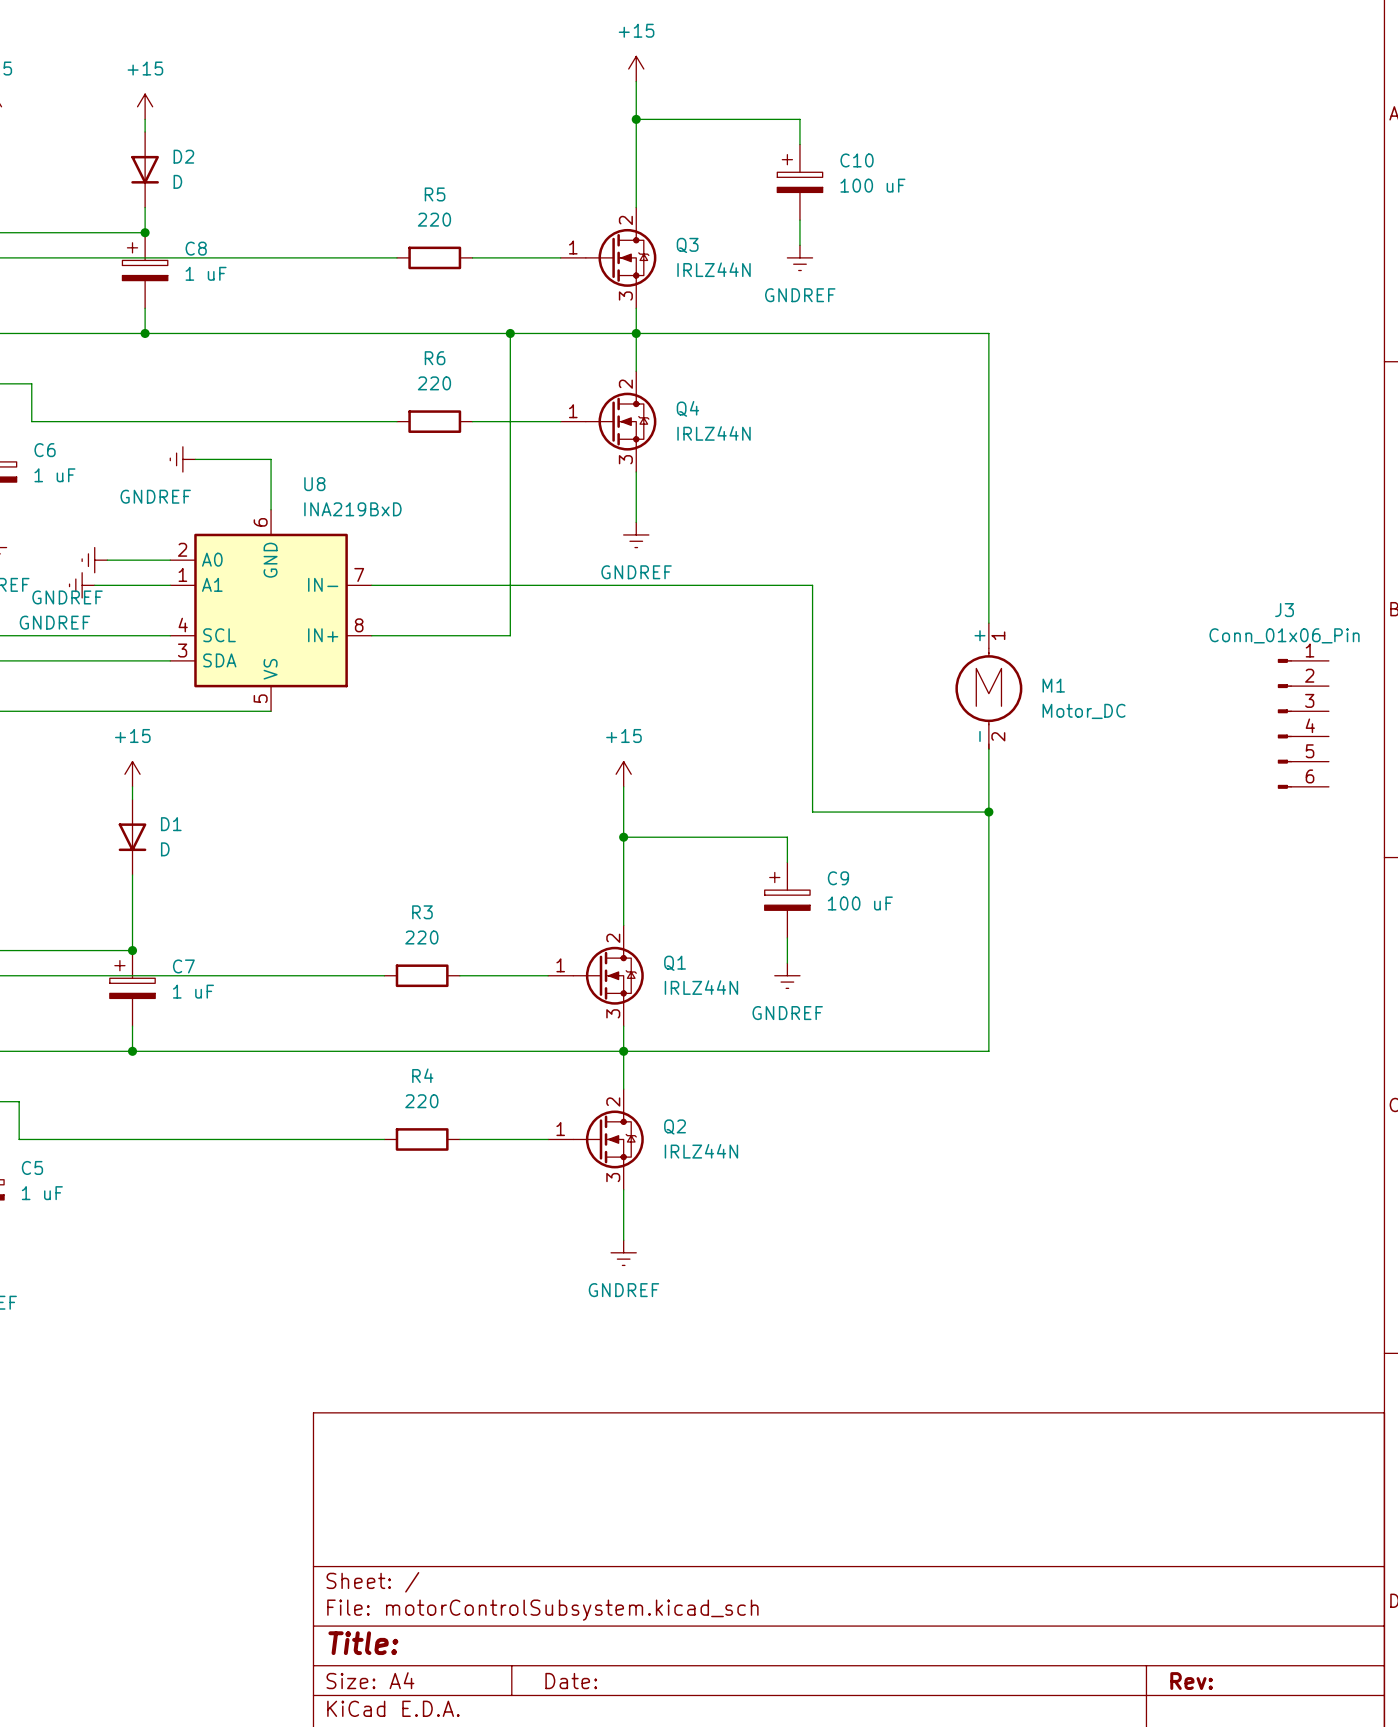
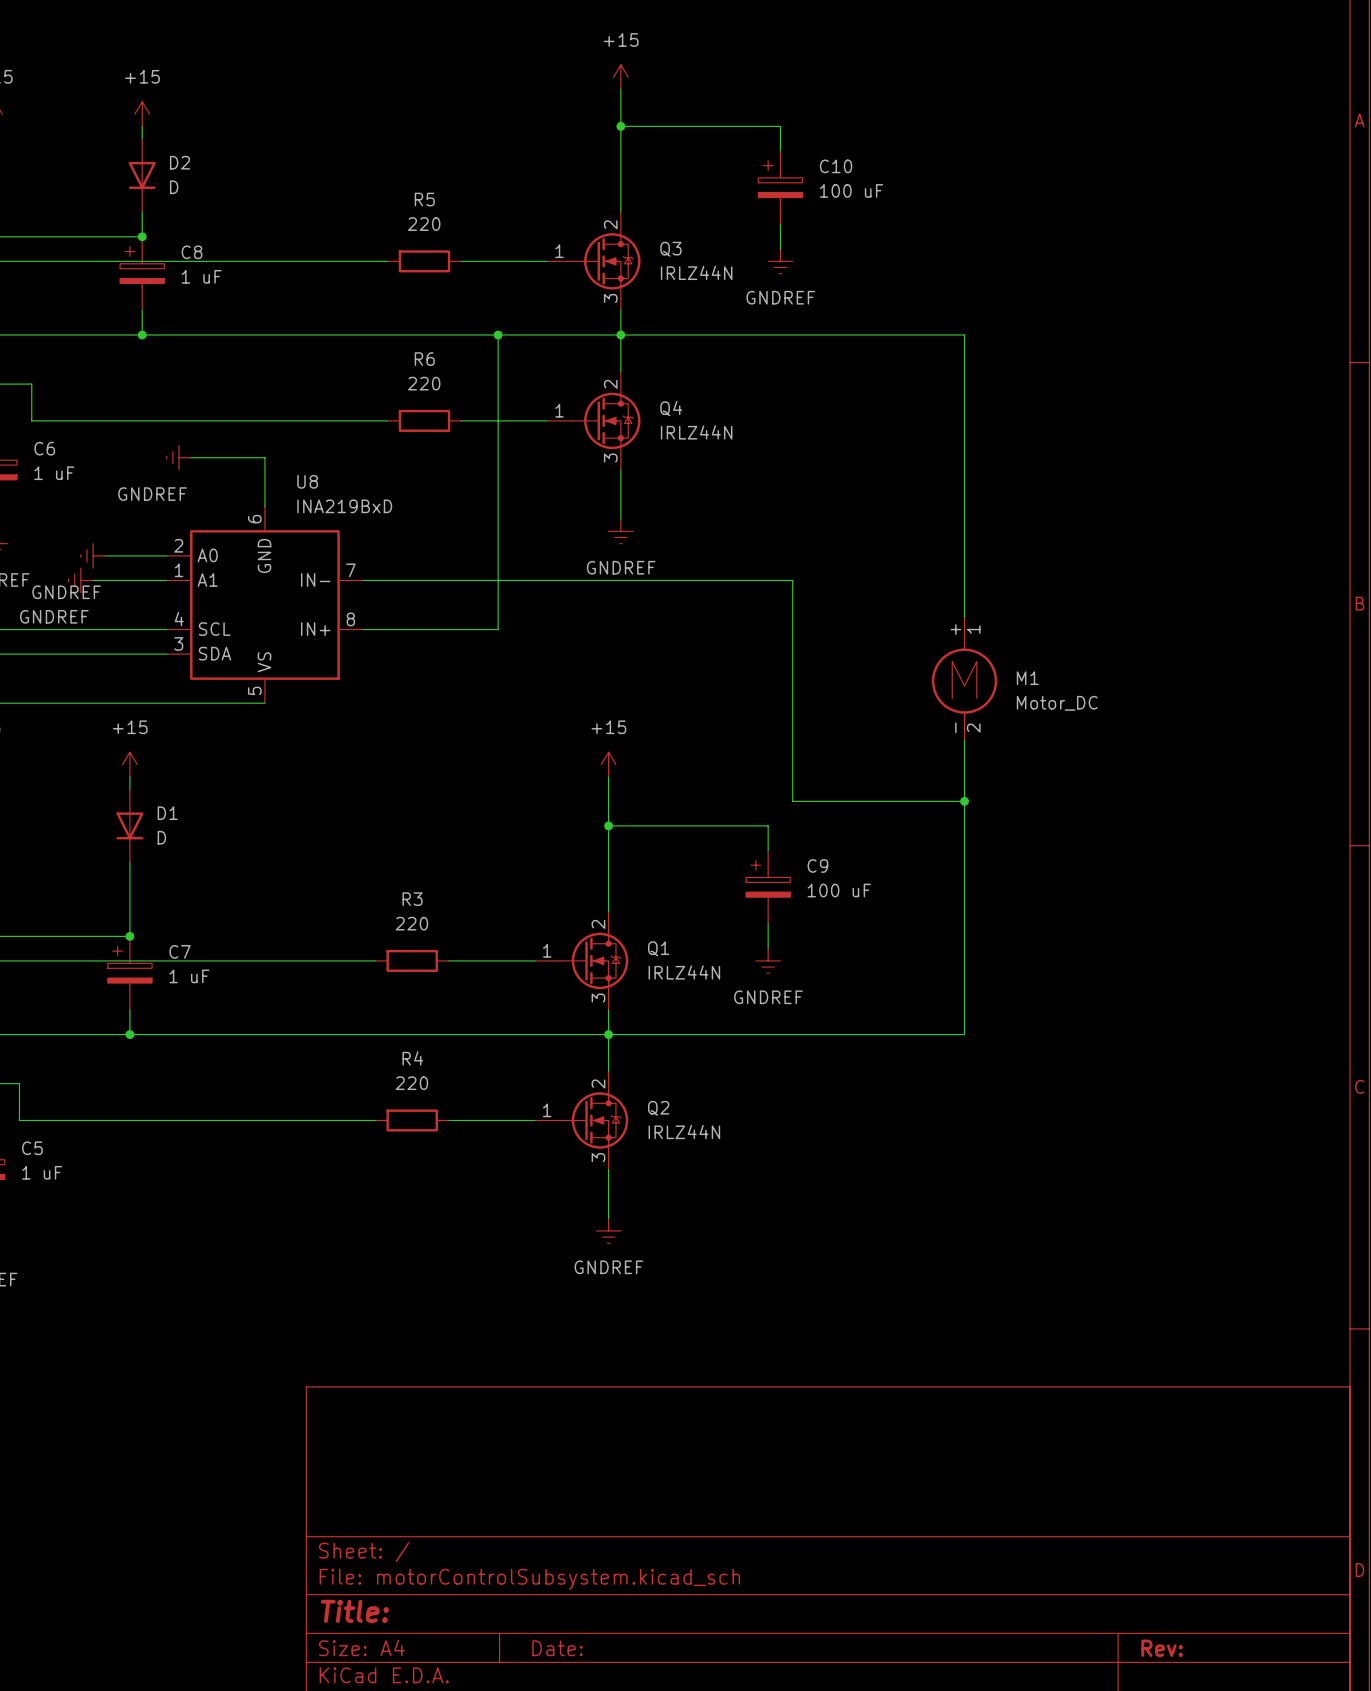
J3: Conn_01x06_Pin (1303, 723) -> none

